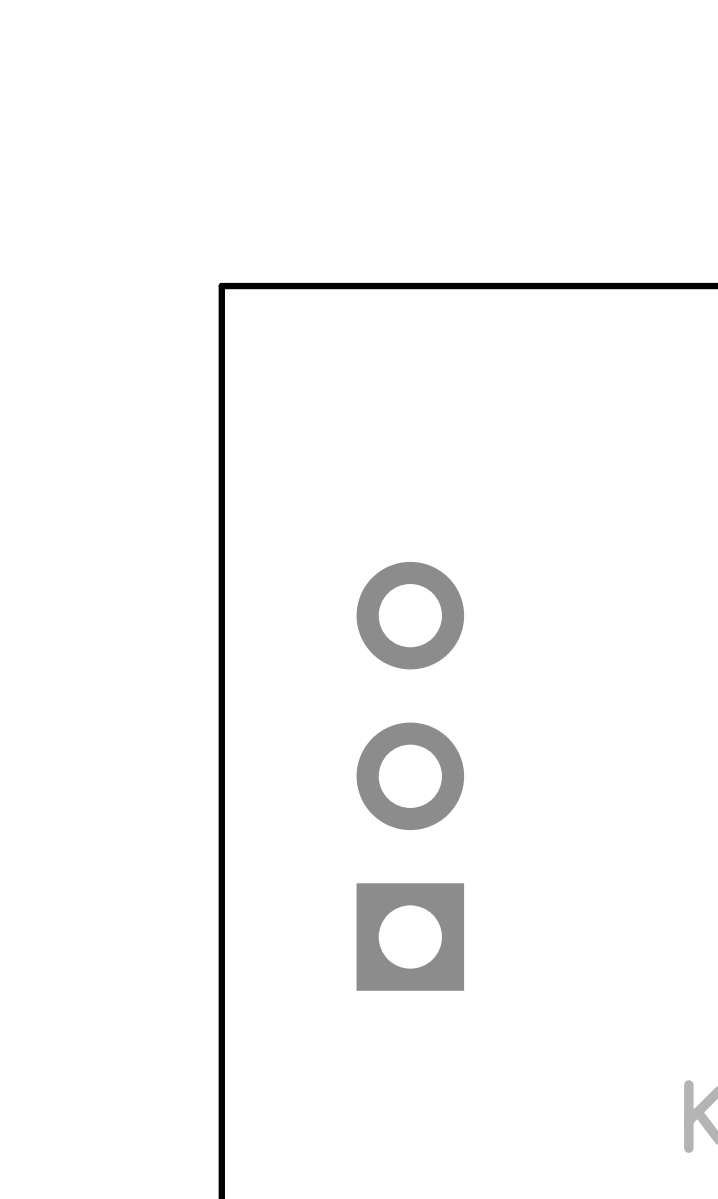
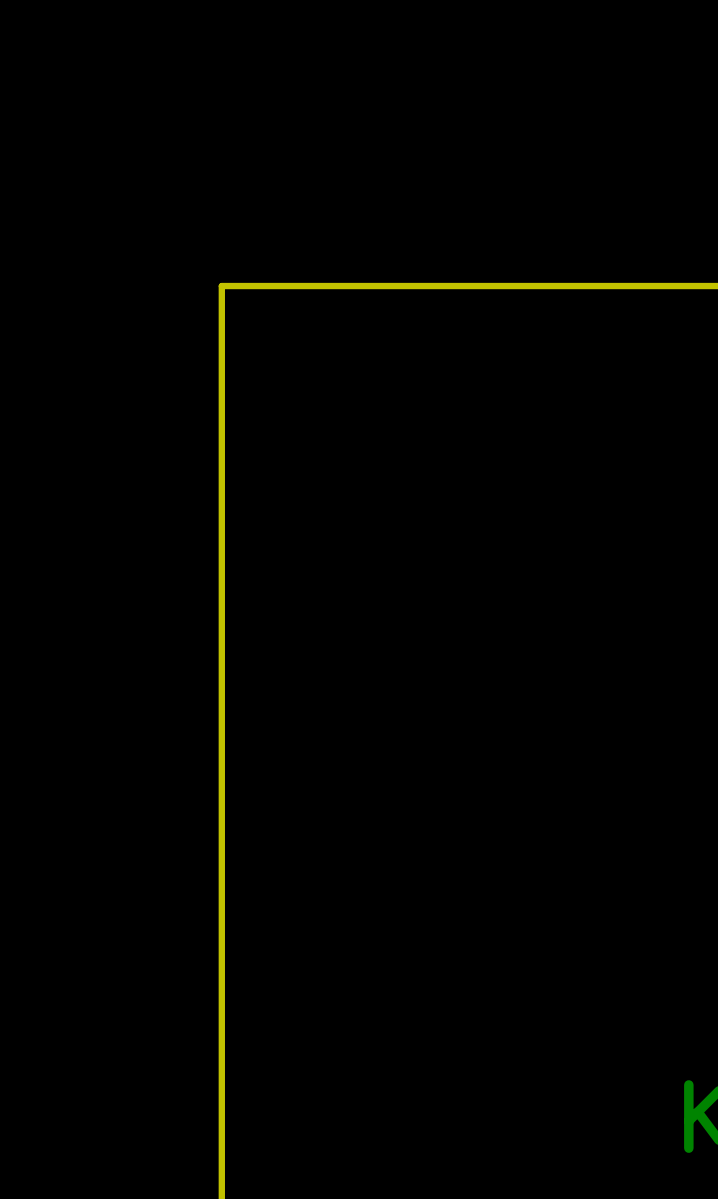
part: (410, 776) -> none

